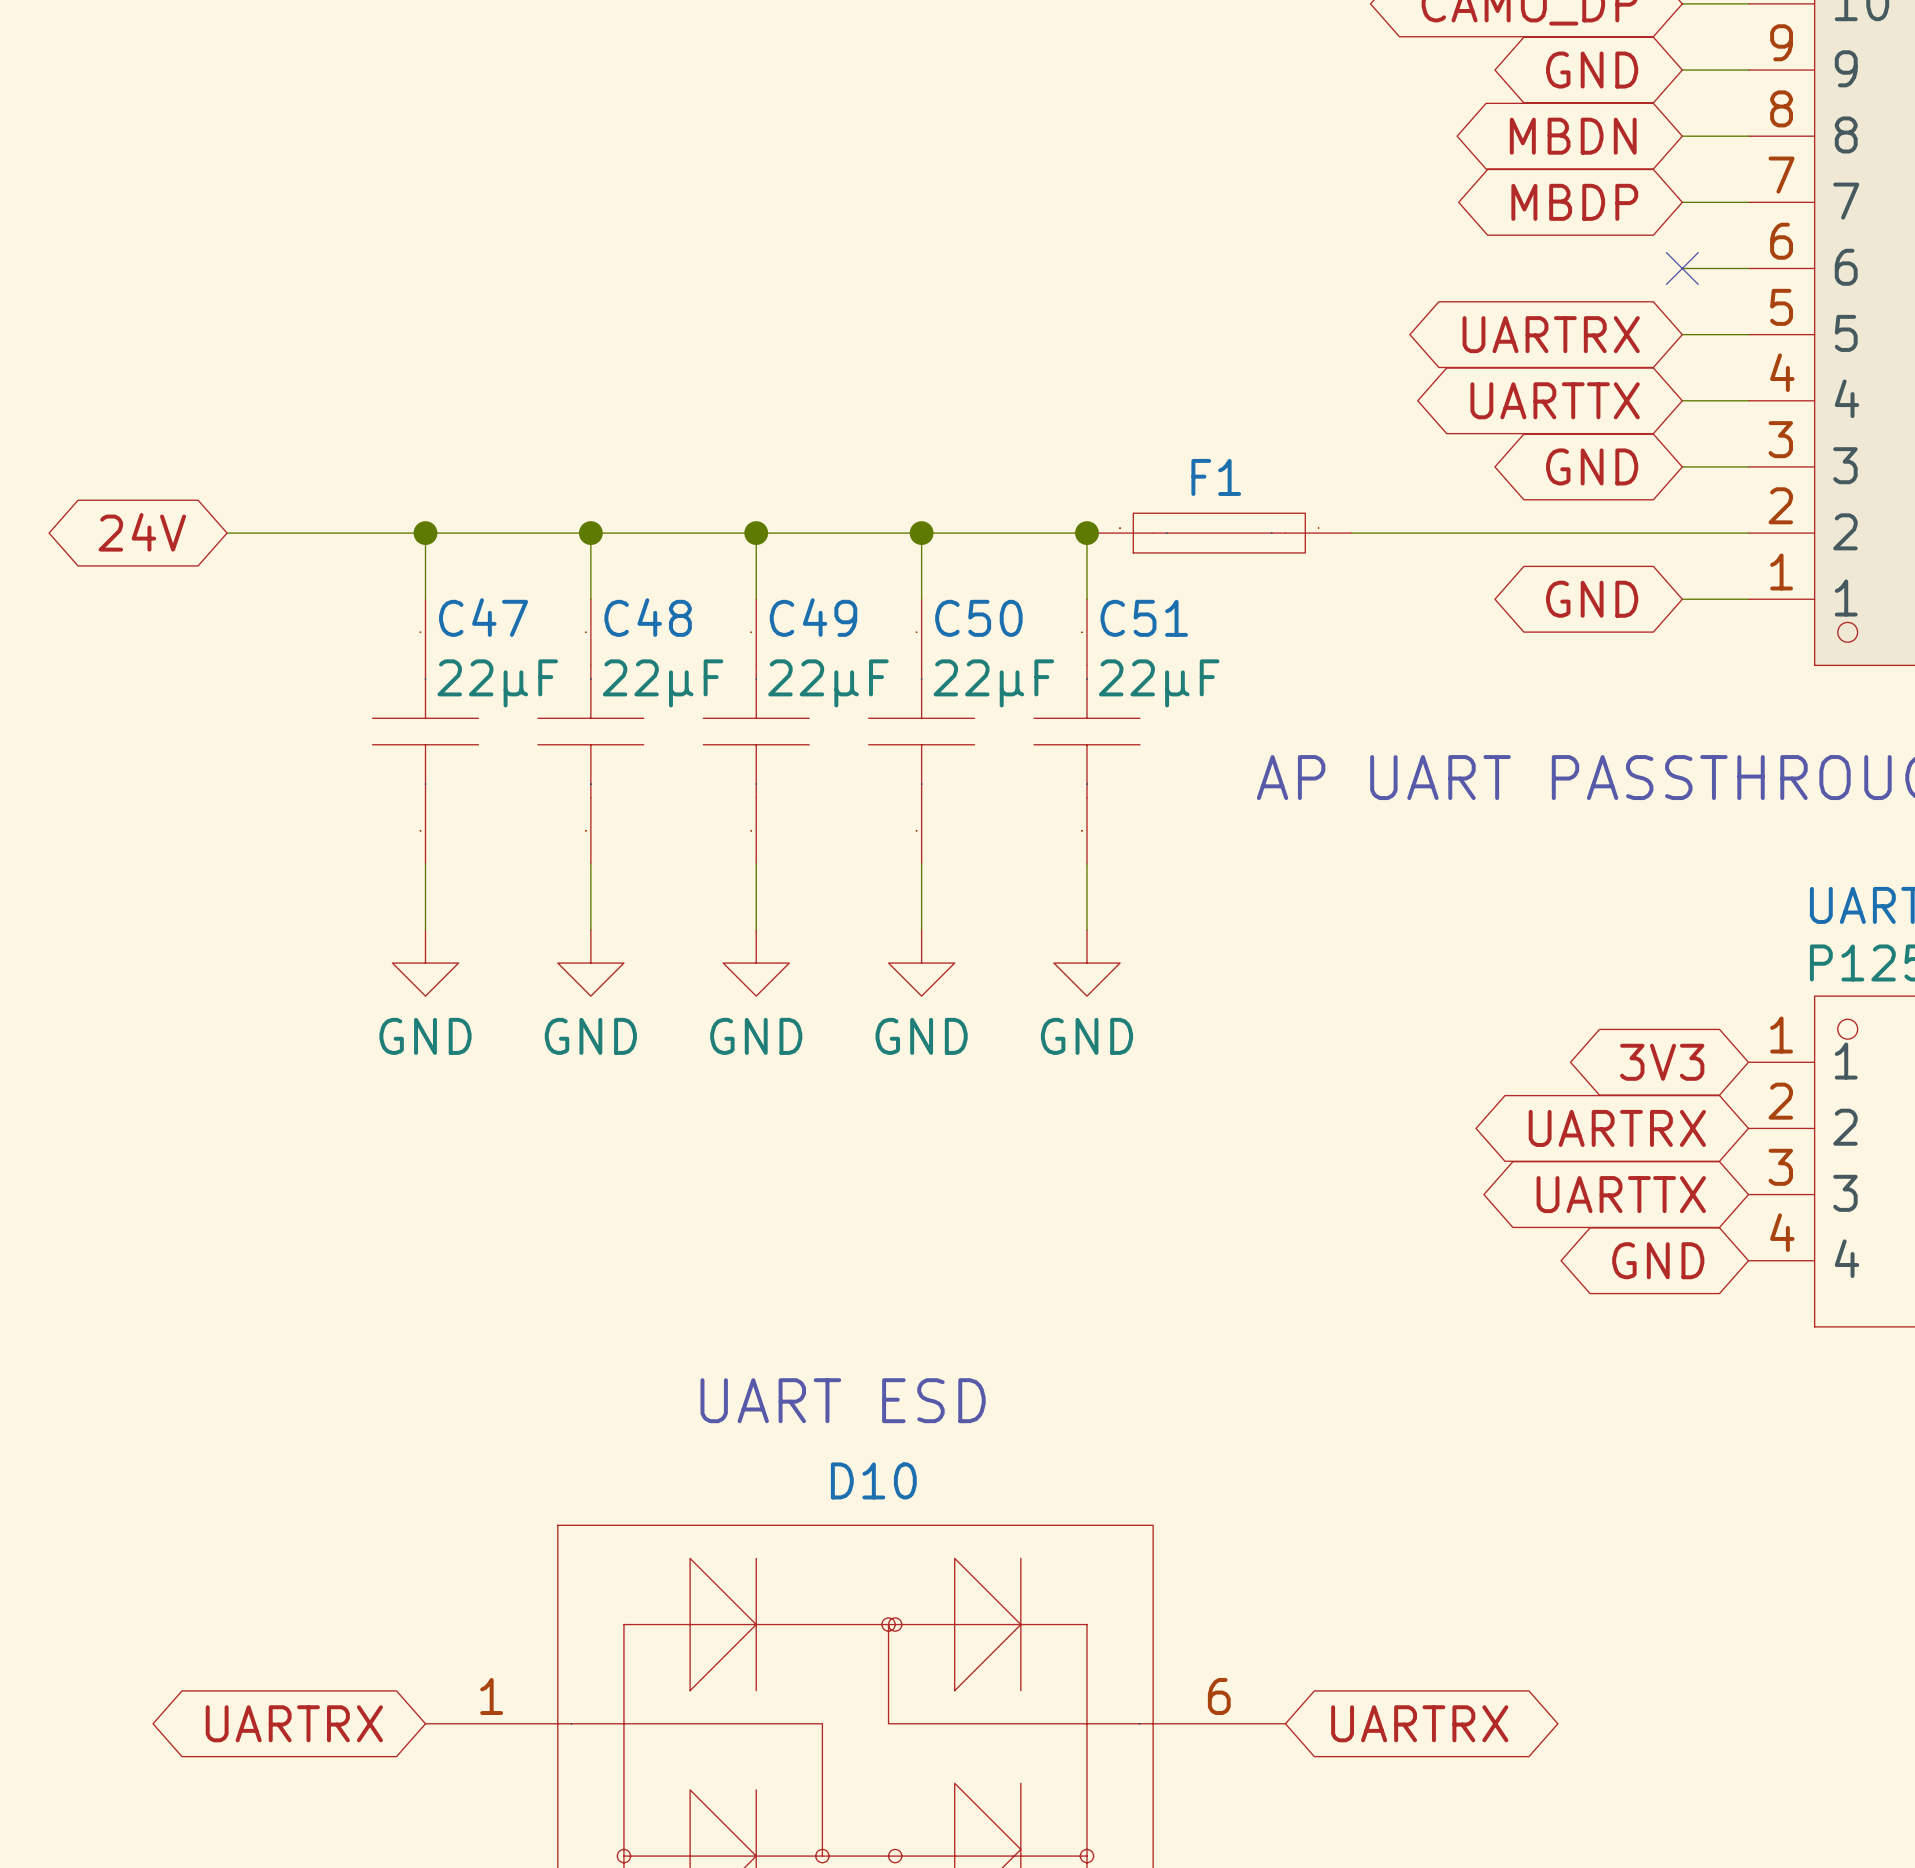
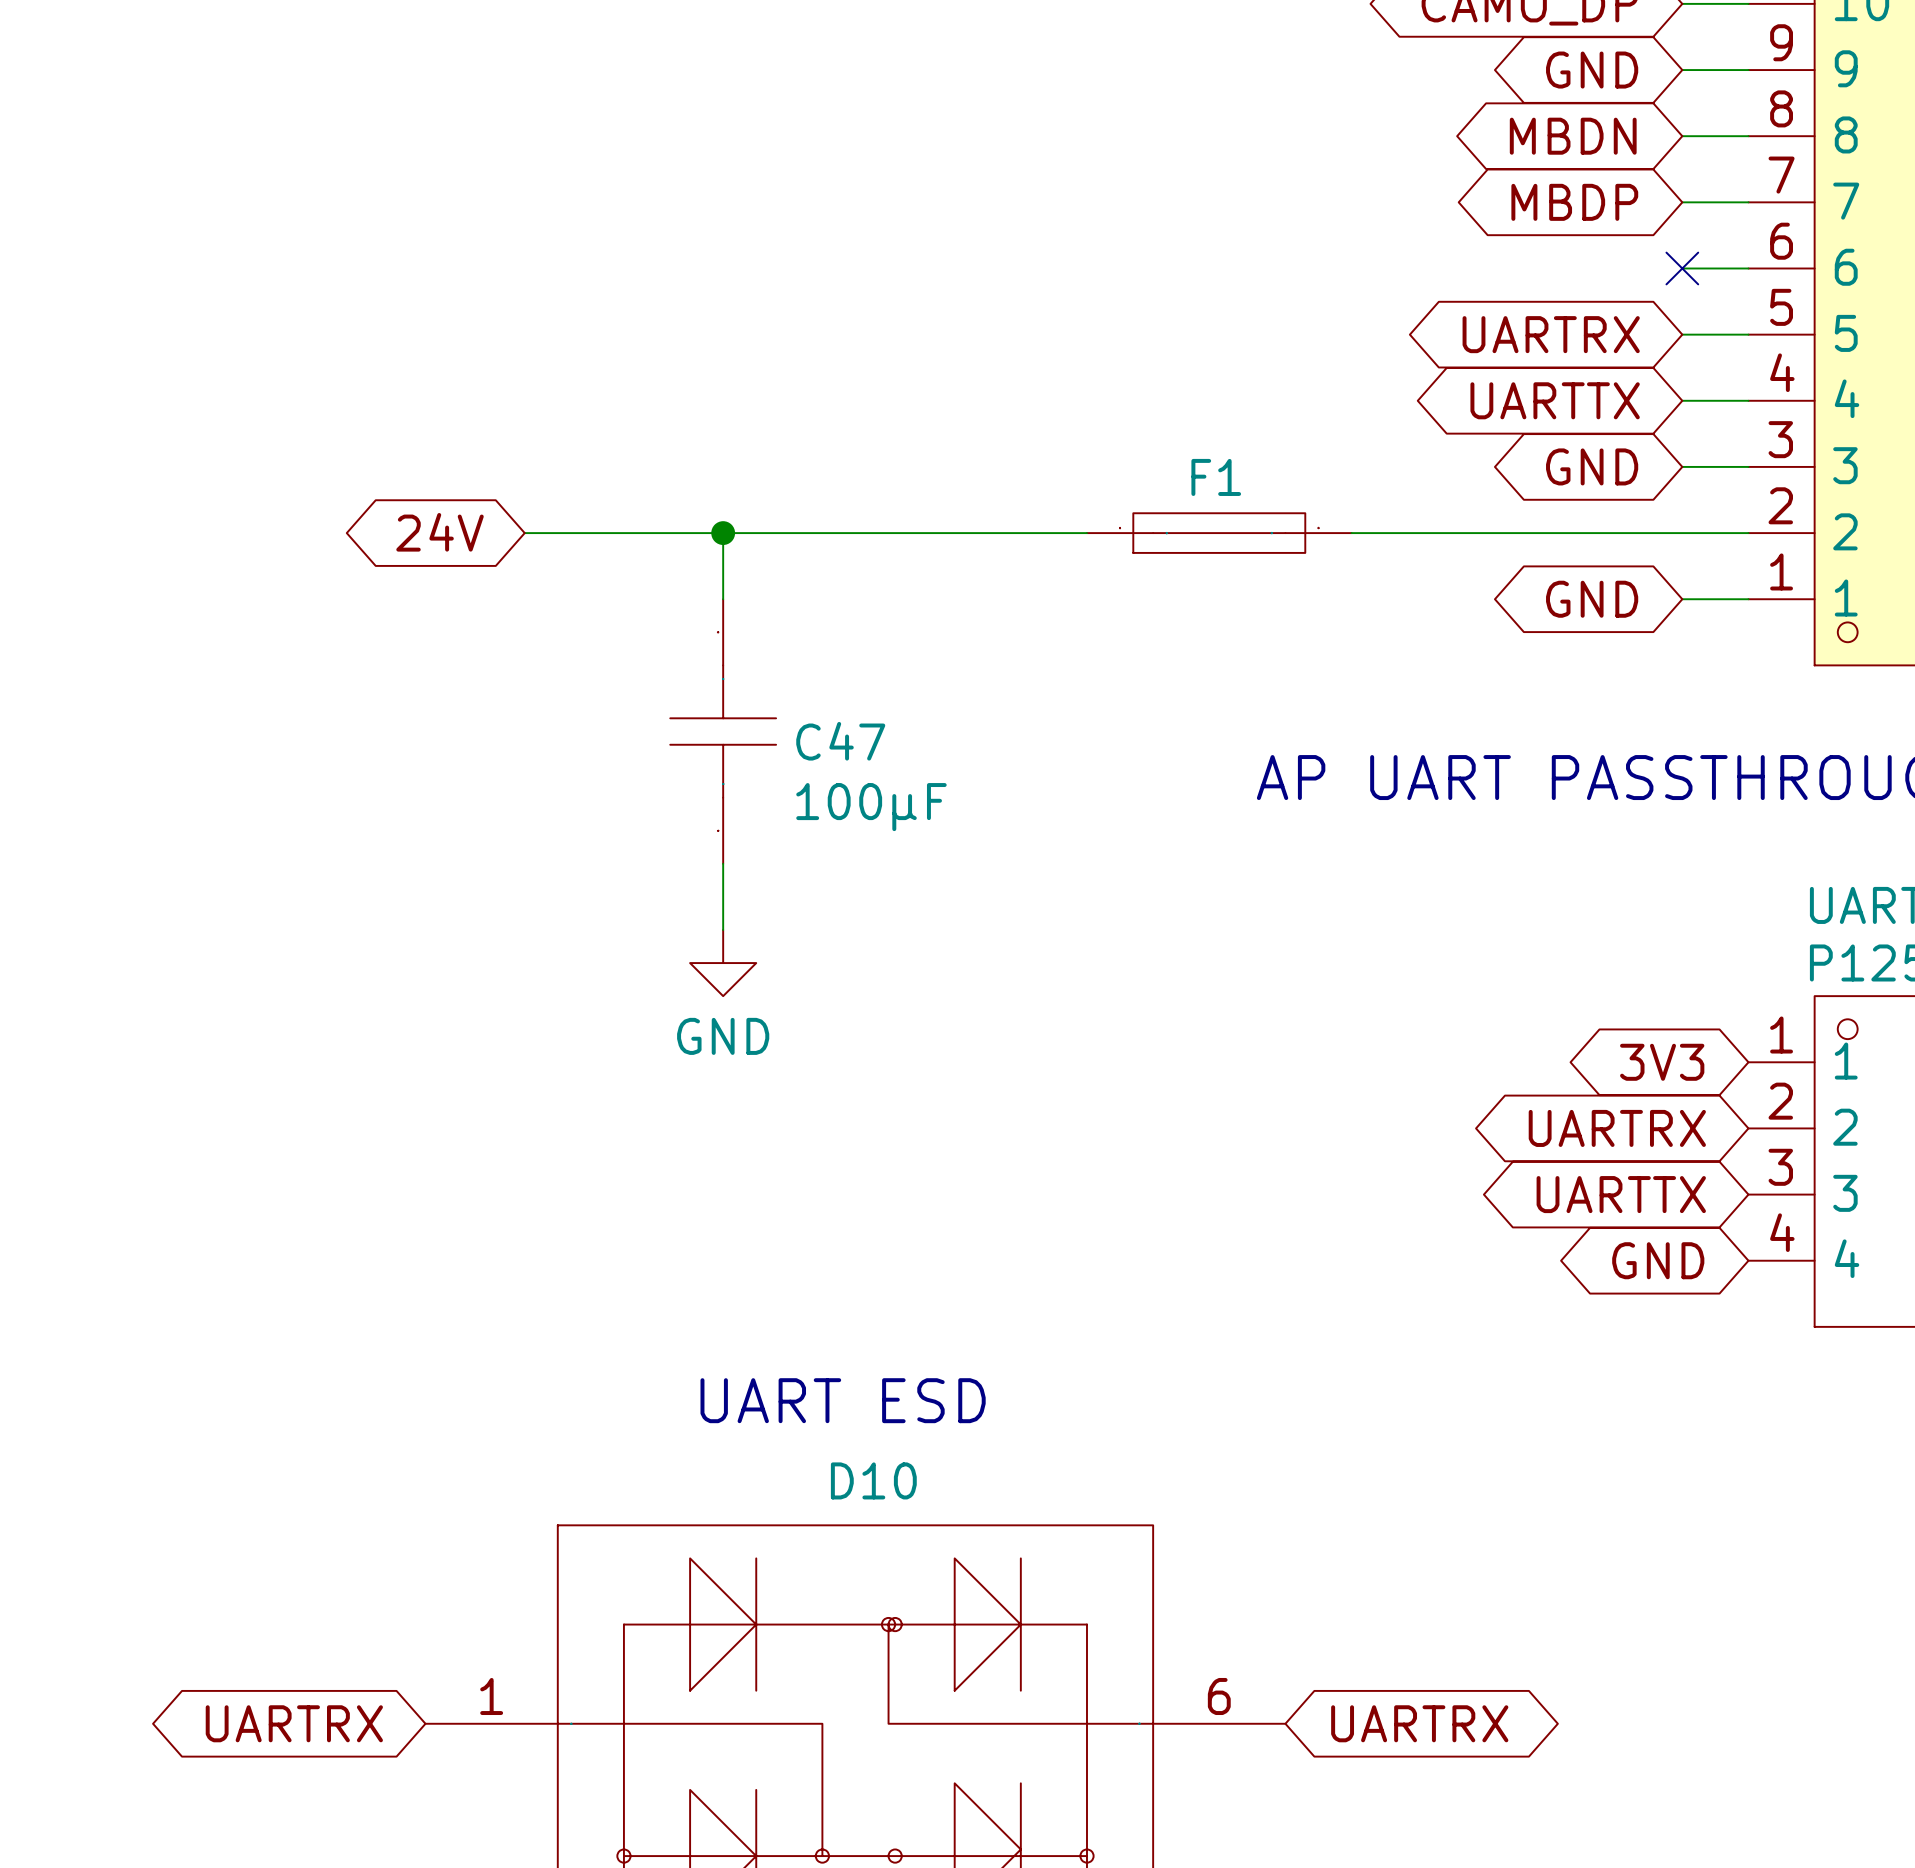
global label position: 24V (142, 532) -> 24V (440, 532)
wire: (227, 533) (524, 533) -> none
wire: (425, 533) (425, 599) -> none
junction: (425, 533) -> none
wire: (590, 533) (590, 599) -> none
junction: (590, 533) -> none
wire: (756, 533) (756, 599) -> (723, 533) (723, 599)
junction position: (756, 533) -> (723, 533)
wire: (921, 533) (921, 599) -> none
junction: (921, 533) -> none
wire: (1086, 533) (1086, 599) -> none
junction: (1086, 533) -> none
C47 name position: C47 (483, 617) -> C47 (840, 741)
C47 value: 22µF (497, 683) -> 100µF (871, 807)
C47 position: (425, 731) -> (723, 731)
C48: 22µF (590, 731) -> none
C49: 22µF (756, 731) -> none
C50: 22µF (921, 731) -> none
C51: 22µF (1086, 731) -> none
wire: (425, 863) (425, 929) -> none
wire: (590, 863) (590, 929) -> none
wire: (756, 863) (756, 929) -> (723, 863) (723, 929)
wire: (921, 863) (921, 929) -> none
wire: (1086, 863) (1086, 929) -> none
power symbol: GND (425, 963) -> none
power symbol: GND (590, 963) -> none
power symbol position: GND (756, 963) -> GND (723, 963)
power symbol: GND (921, 963) -> none
power symbol: GND (1086, 963) -> none

